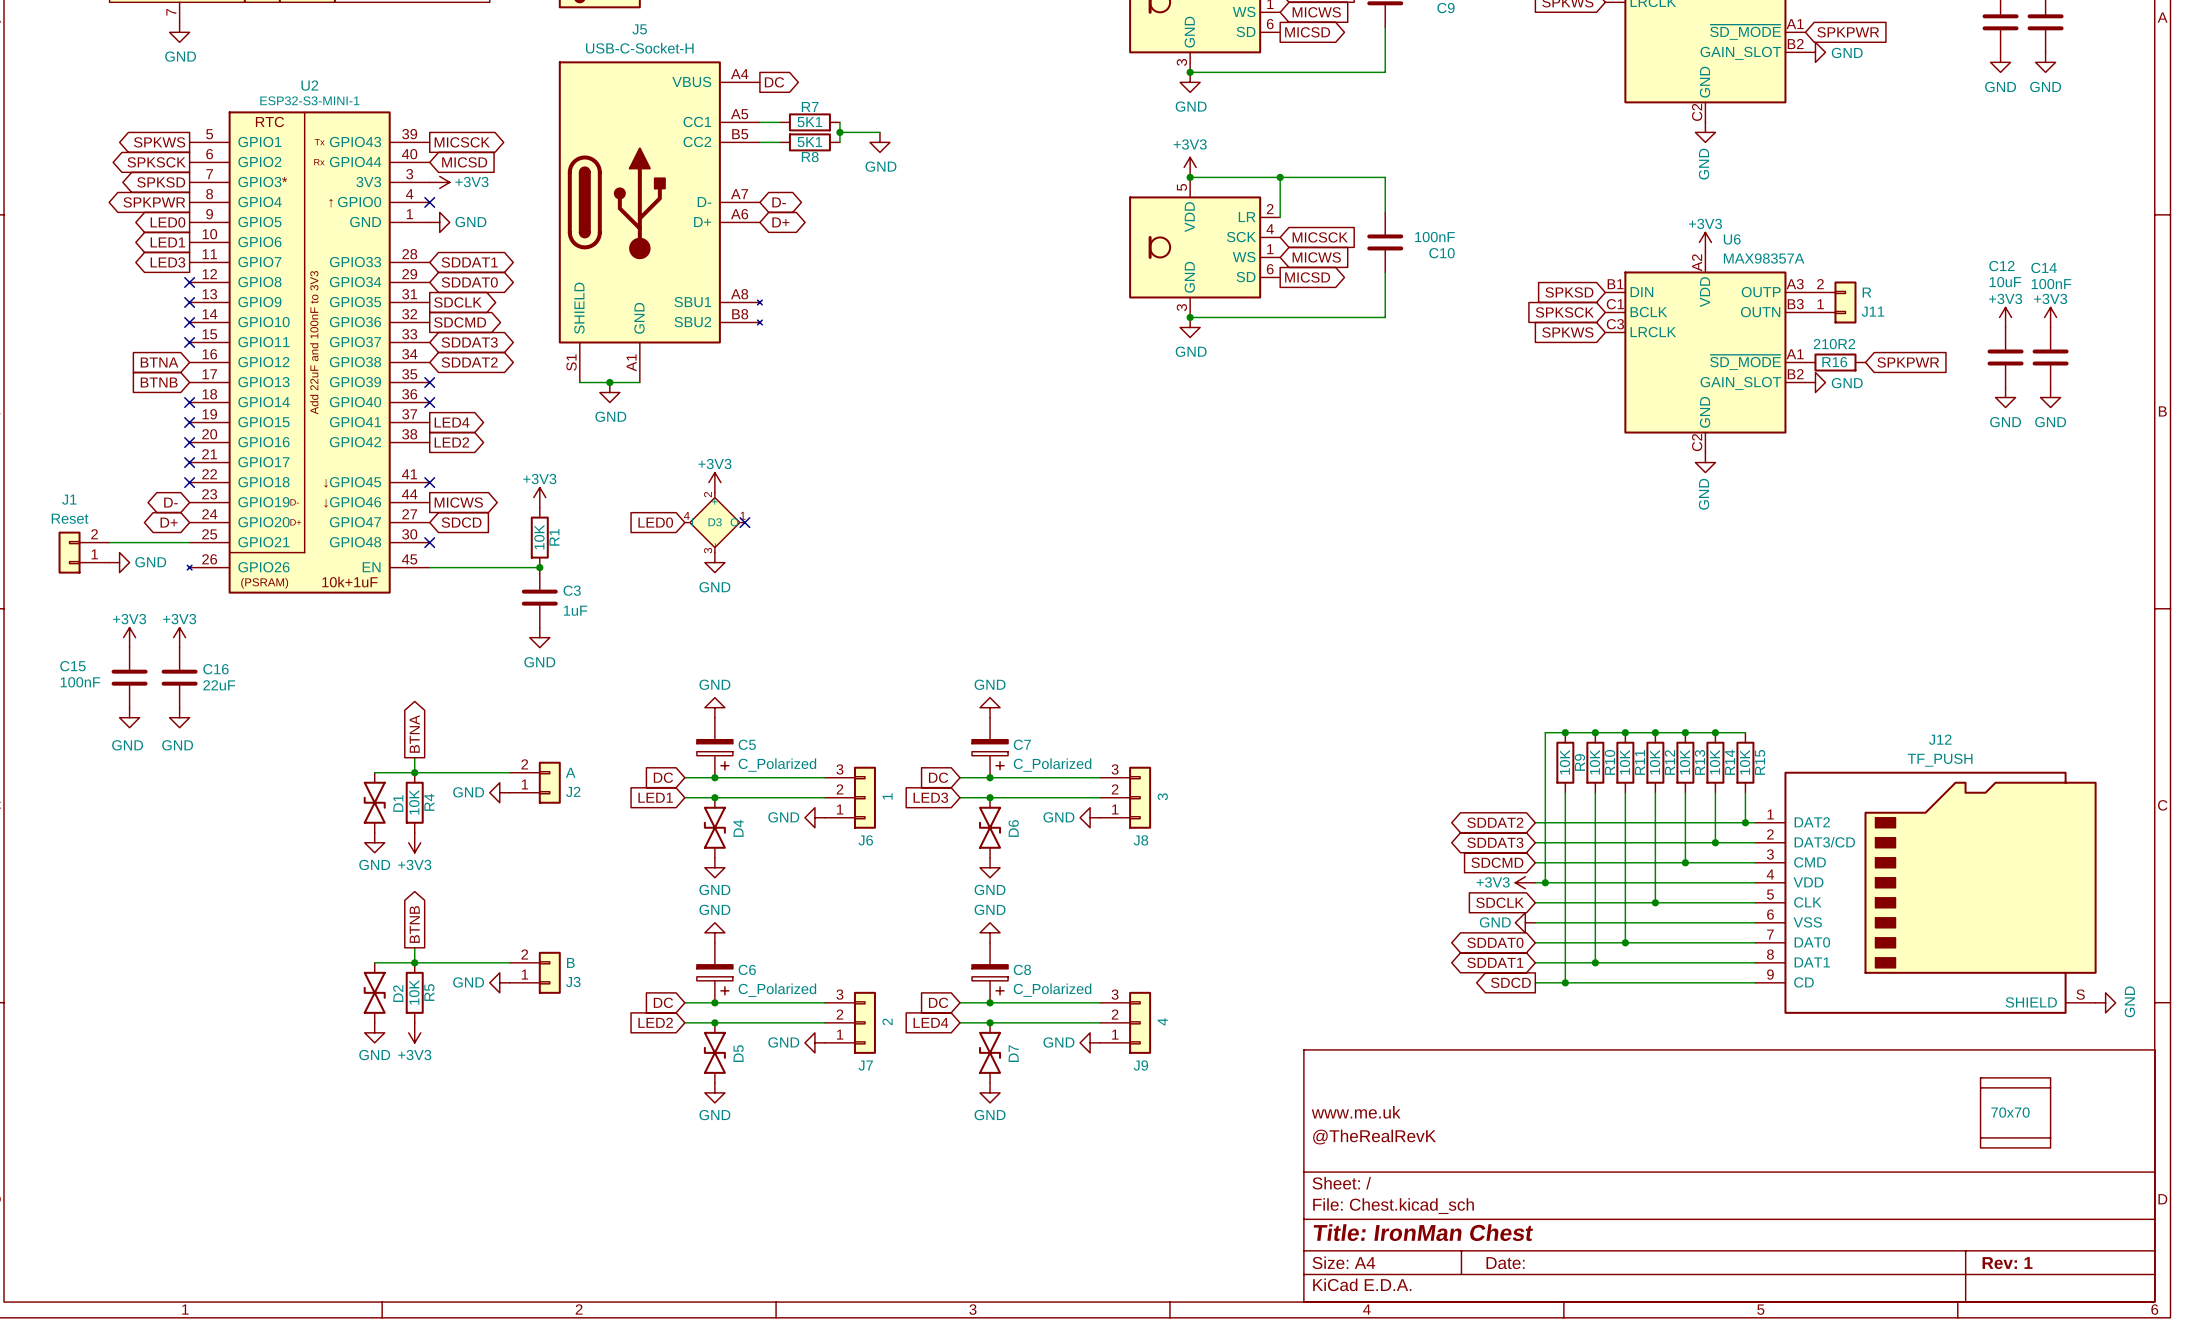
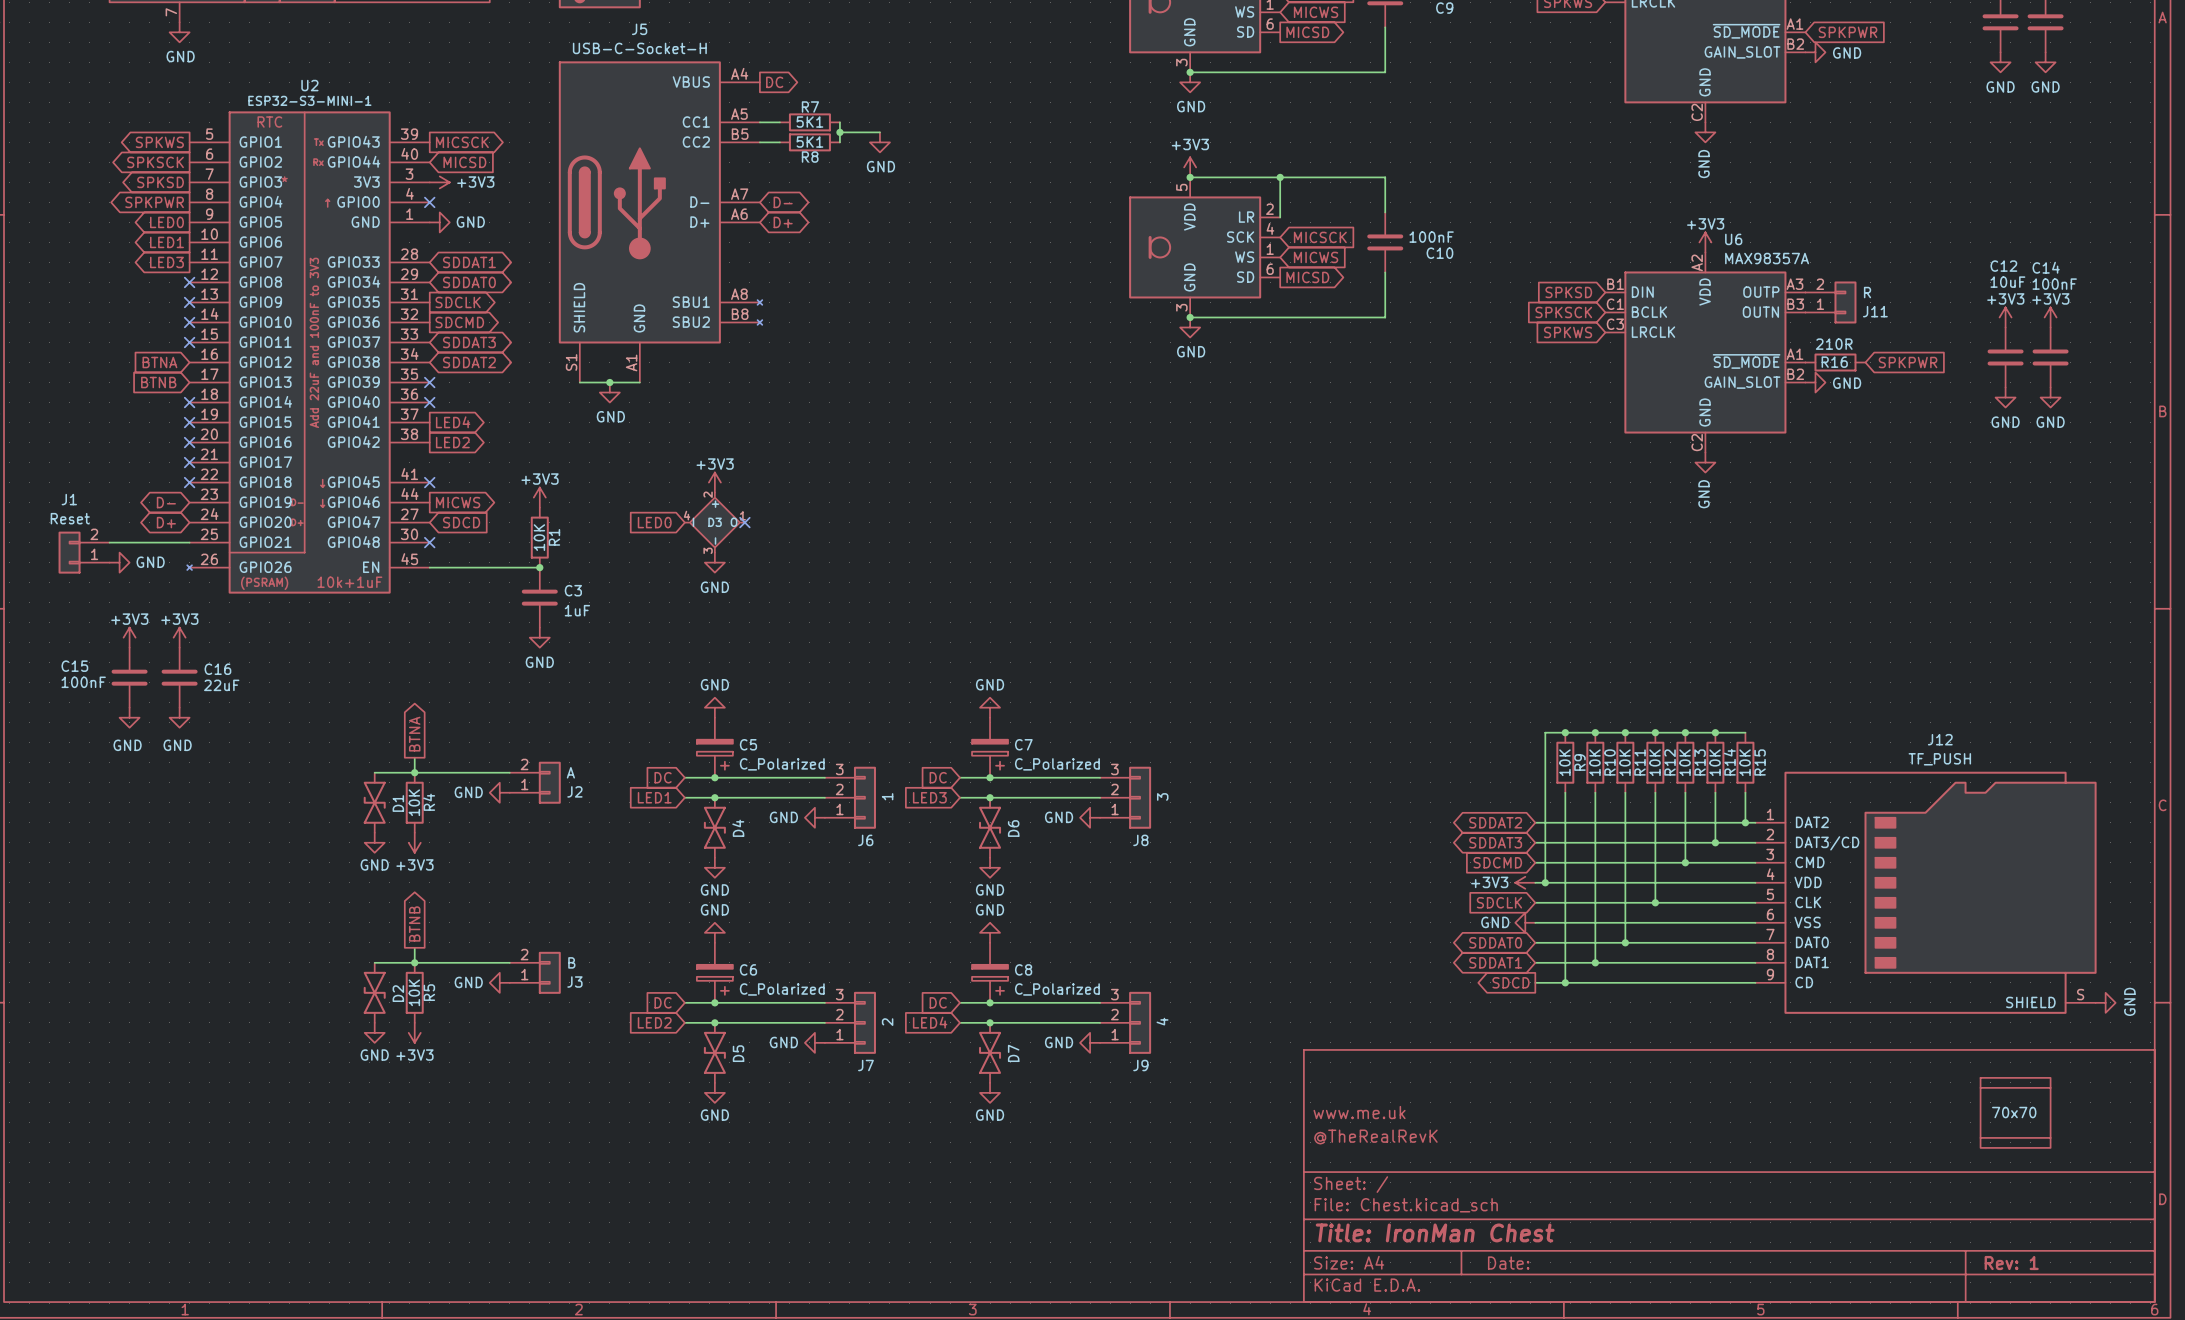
R16 value: 210R2 (1834, 344) -> 210R (1834, 344)

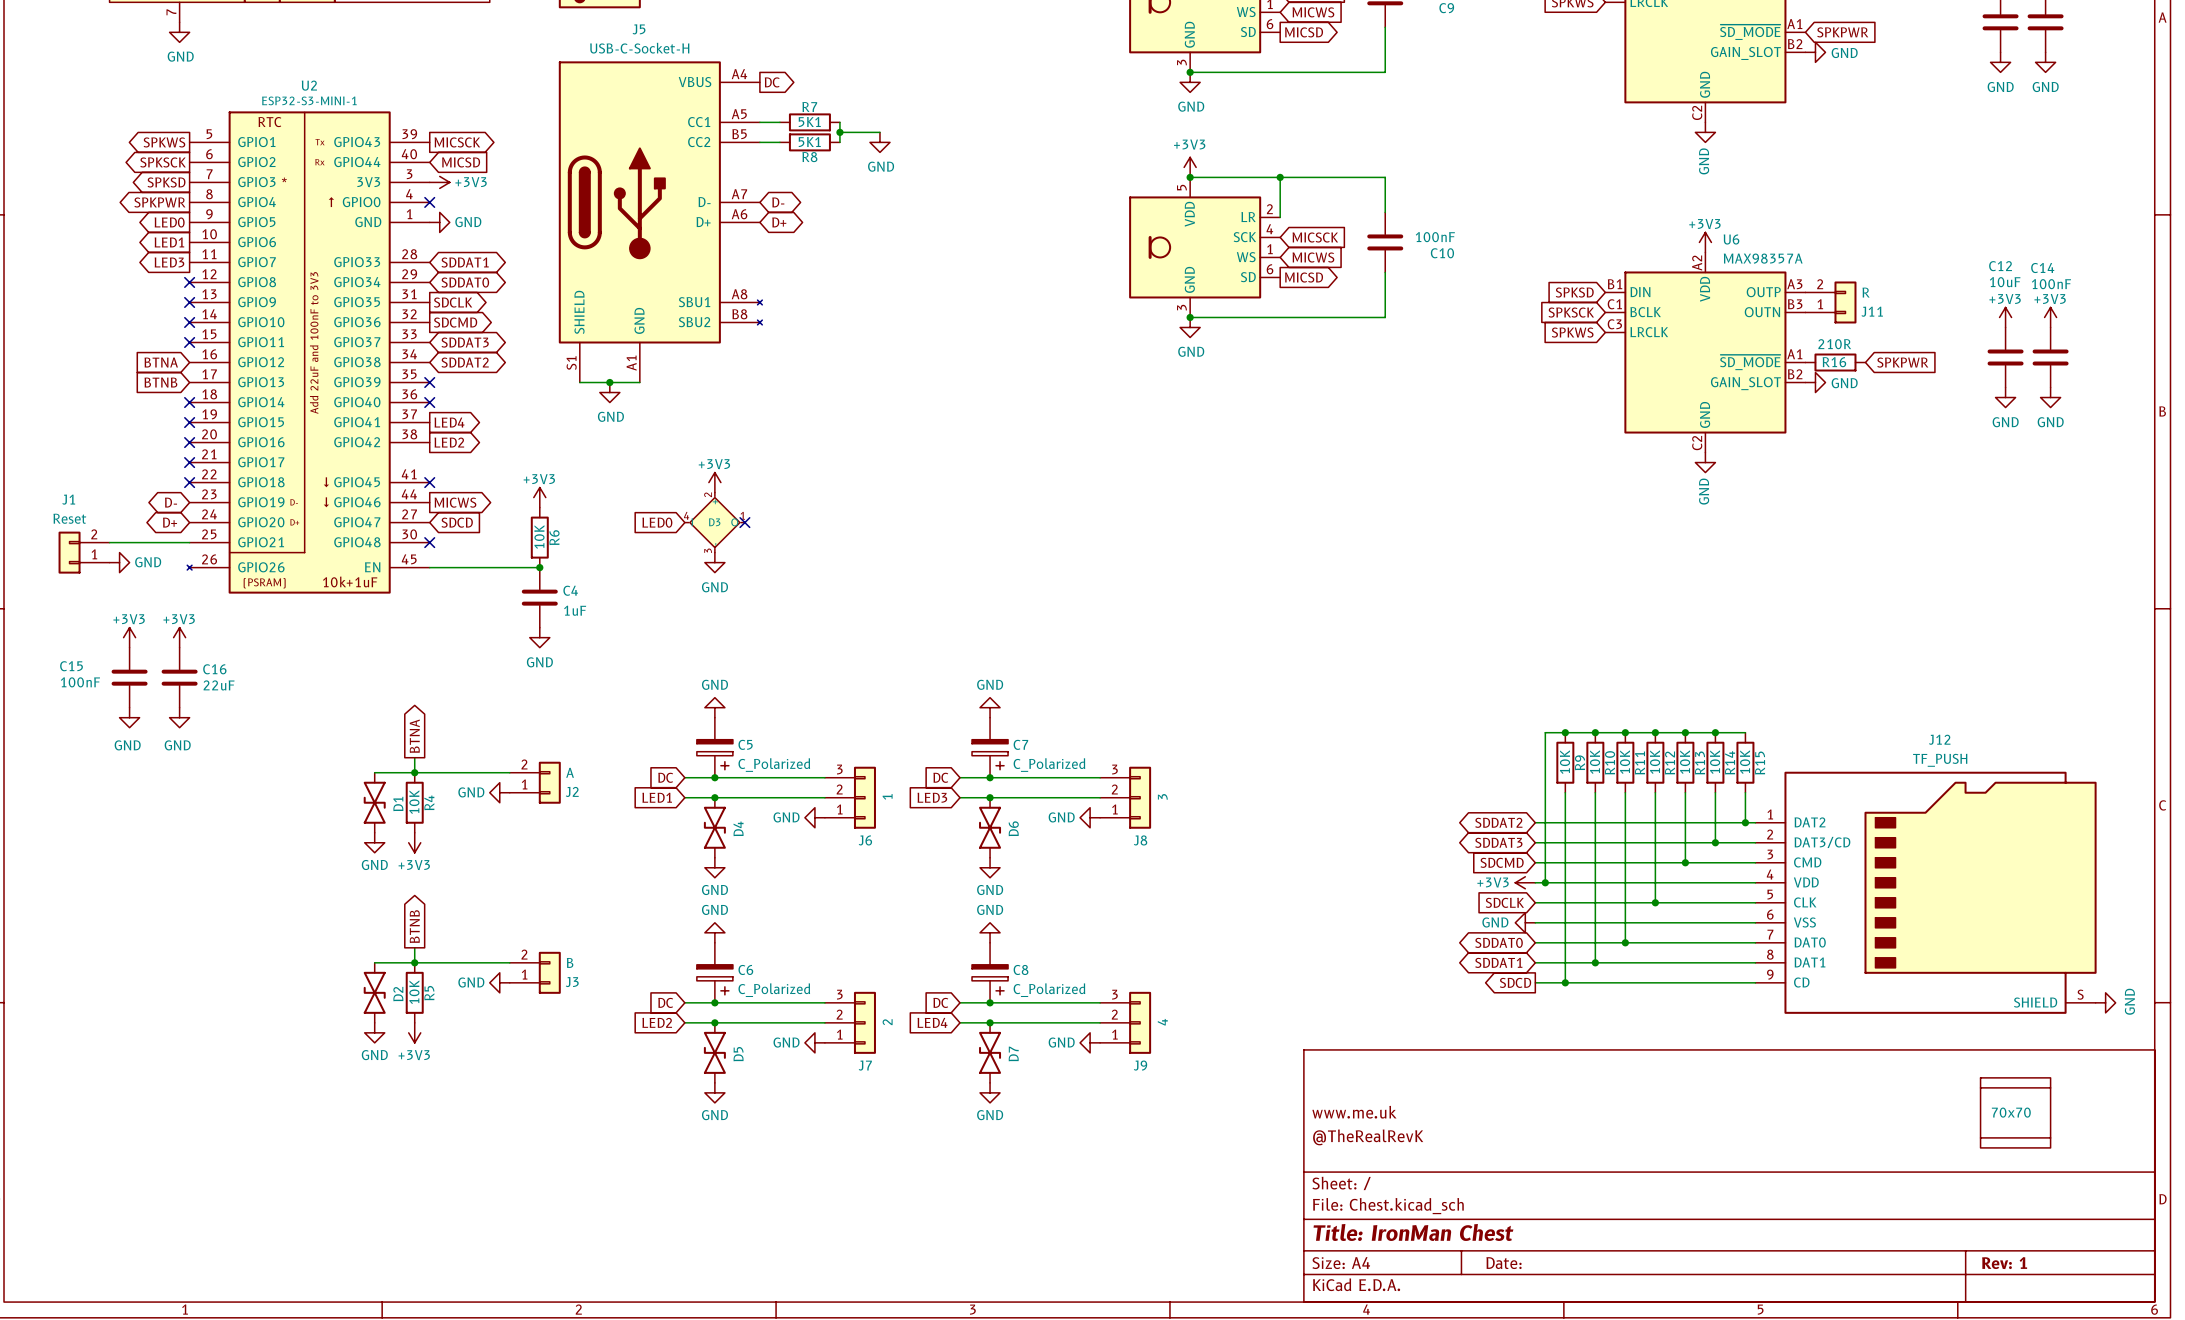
R1 name: R1 (554, 537) -> R6 (554, 537)
C3 name: C3 (573, 590) -> C4 (570, 590)

